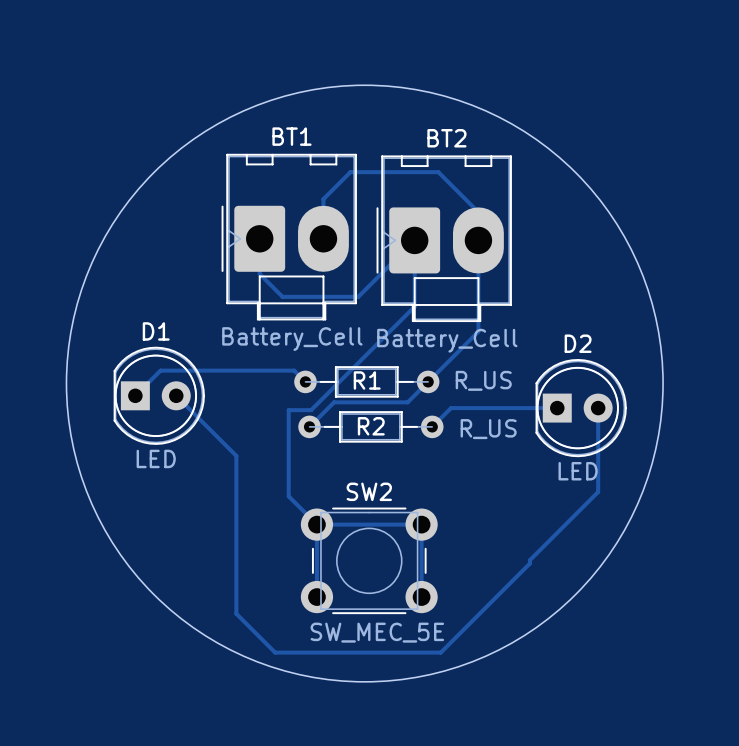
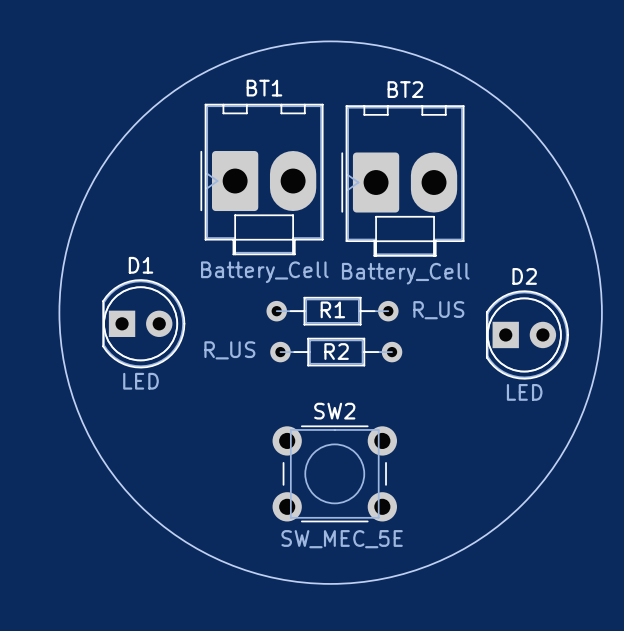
track: (259, 238) (259, 274) (282, 296) (358, 296) (414, 240) (414, 306) (311, 410) (288, 410) (288, 496) (316, 524) -> none
track: (323, 238) (323, 199) (350, 172) (438, 172) (478, 212) (478, 331) (407, 402) (334, 402) (309, 426) -> none
track: (305, 381) (294, 370) (160, 370) (135, 395) -> none
track: (176, 395) (236, 455) (236, 613) (275, 652) (440, 652) (598, 491) (598, 408) -> none
track: (557, 408) (451, 408) (432, 426) -> none
R2 value position: R_US (488, 429) -> R_US (229, 350)
track: (316, 524) (421, 524) (421, 597) -> none
track: (316, 524) (316, 597) -> none

